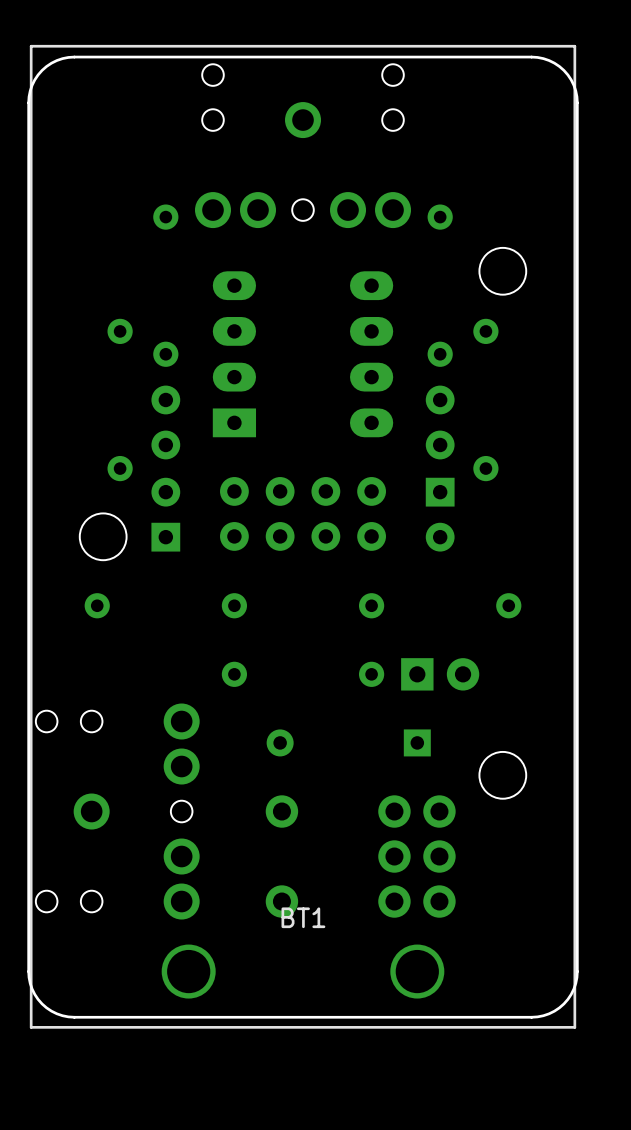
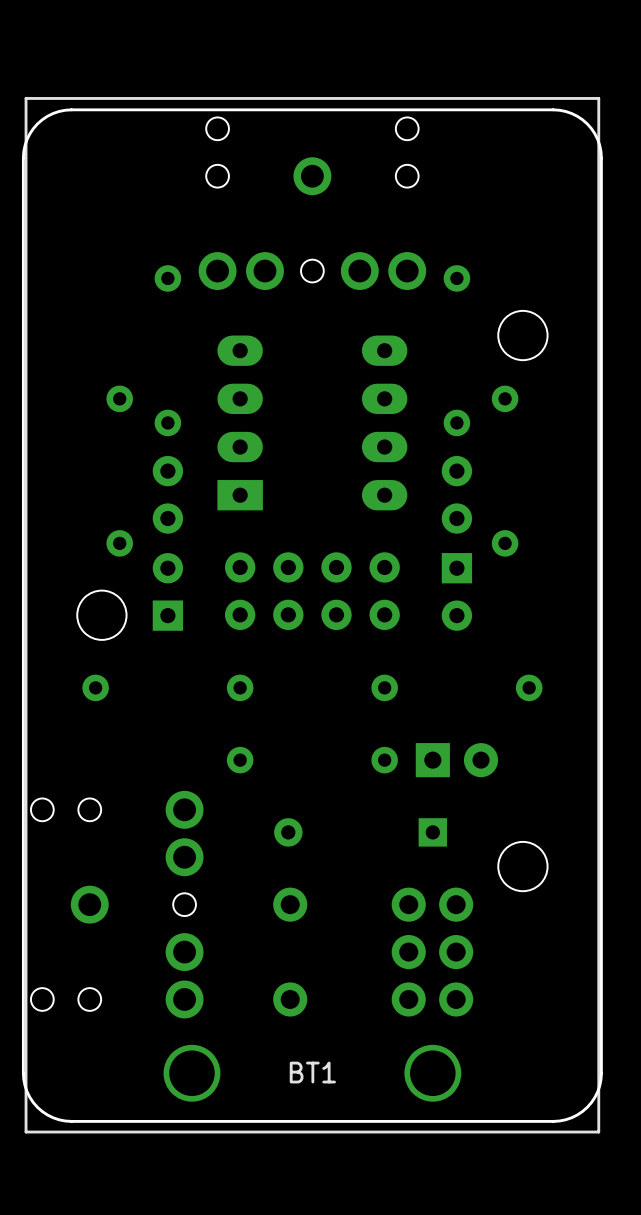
BT1 name position: BT1 (303, 917) -> BT1 (312, 1072)

